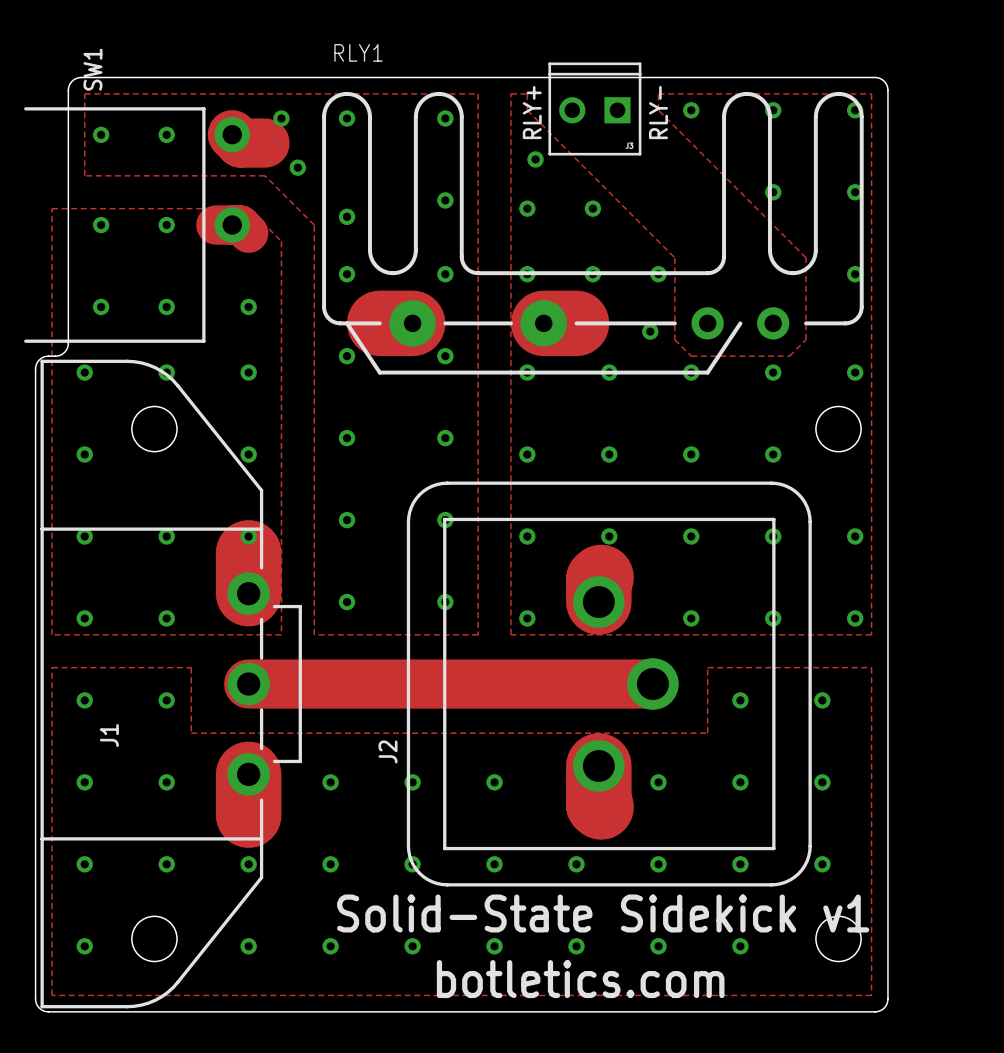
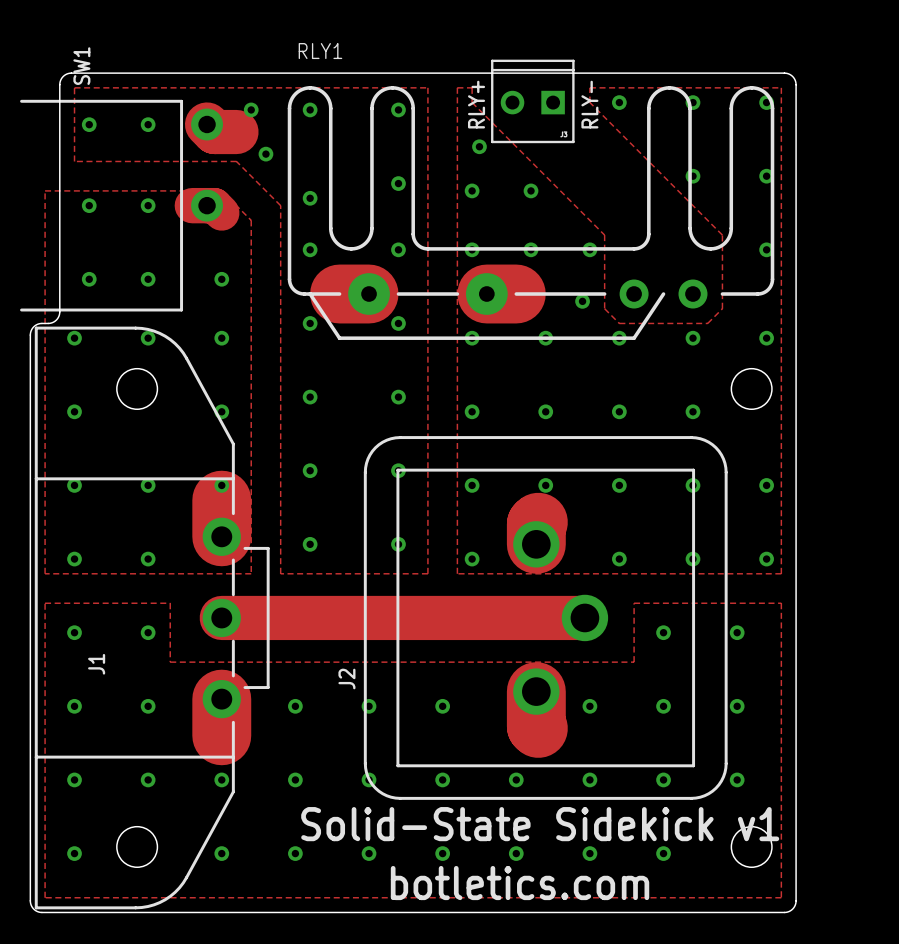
J1 footprint: [40, 359, 302, 1009] -> [34, 326, 270, 910]

